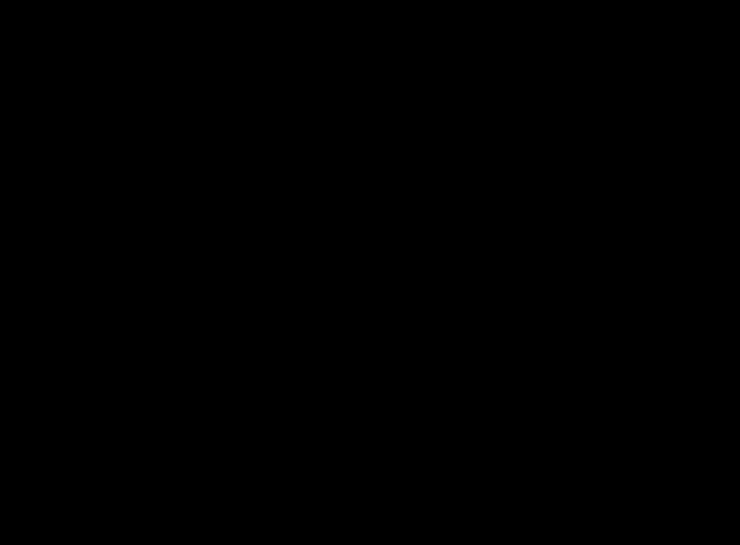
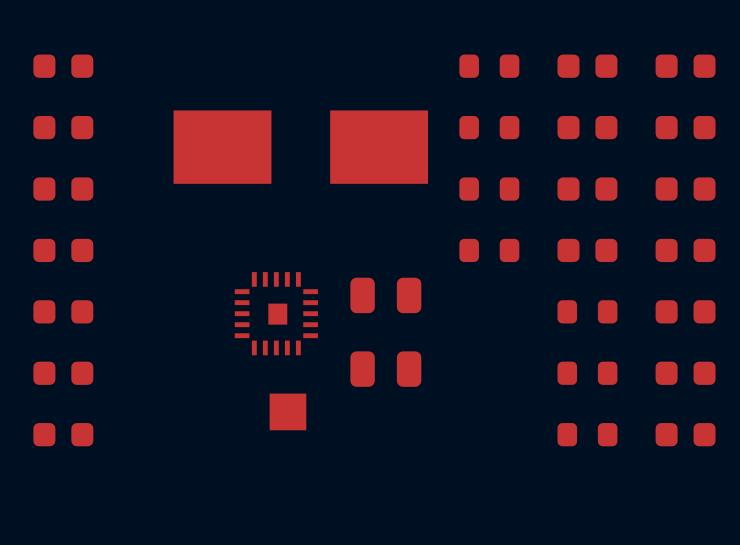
part: none -> (63, 66)
part: none -> (489, 66)
part: none -> (587, 66)
part: none -> (685, 66)
part: none -> (63, 127)
part: none -> (489, 127)
part: none -> (587, 127)
part: none -> (685, 127)
part: none -> (300, 147)
part: none -> (63, 189)
part: none -> (489, 189)
part: none -> (587, 189)
part: none -> (685, 189)
part: none -> (63, 250)
part: none -> (489, 250)
part: none -> (587, 250)
part: none -> (685, 250)
part: none -> (385, 295)
part: none -> (63, 311)
part: none -> (587, 311)
part: none -> (685, 311)
part: none -> (276, 313)
part: none -> (385, 369)
part: none -> (63, 373)
part: none -> (587, 373)
part: none -> (685, 373)
part: none -> (287, 411)
part: none -> (63, 434)
part: none -> (587, 434)
part: none -> (685, 434)

